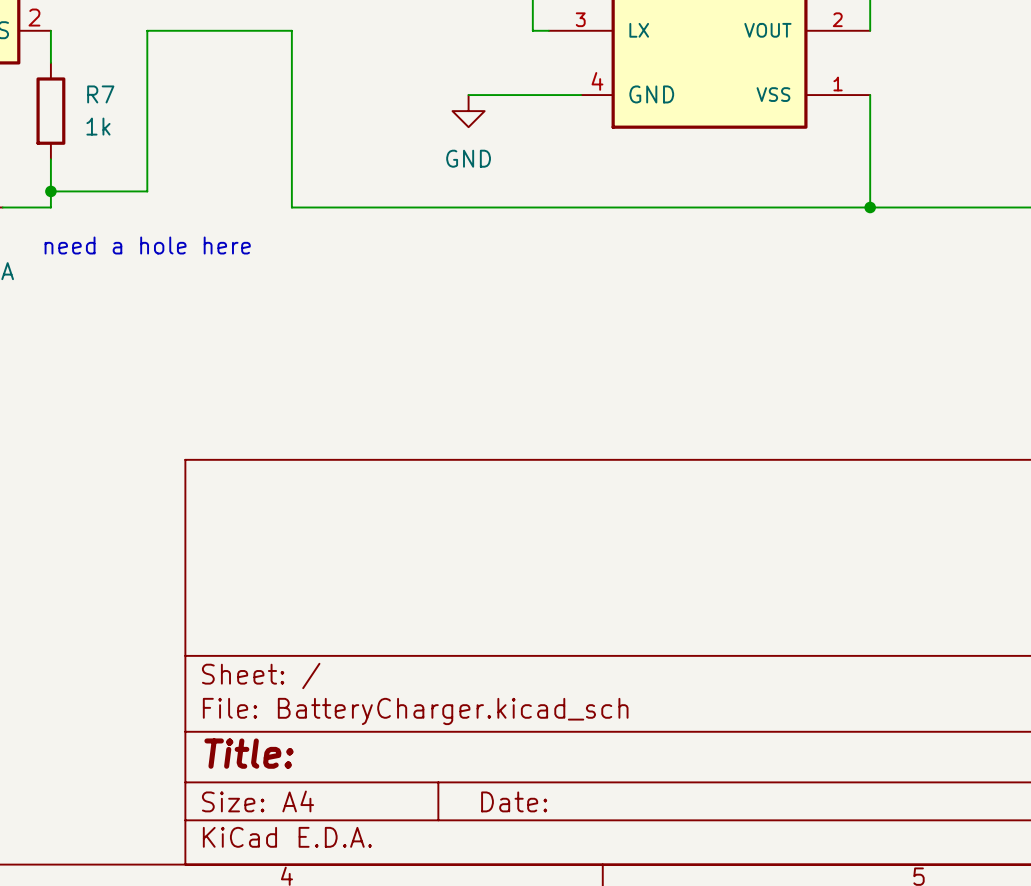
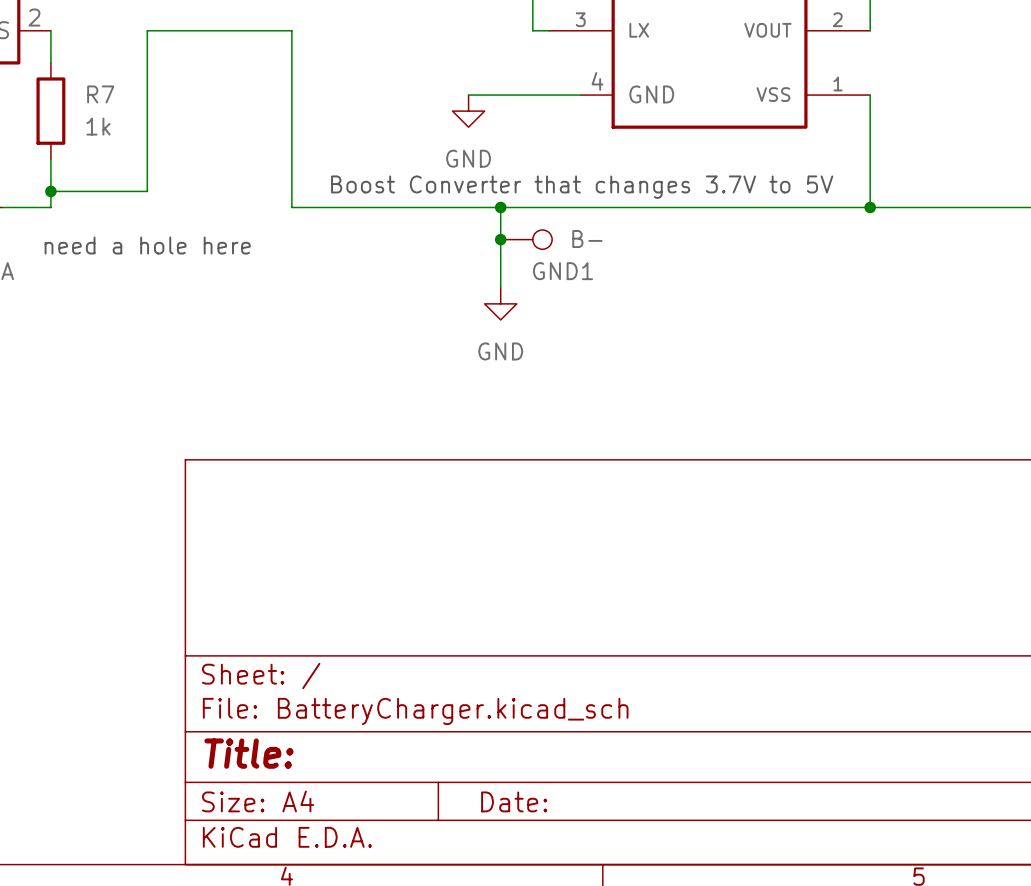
text: none -> Boost Converter that changes 3.7V to 5V (582, 187)
wire: none -> (500, 207) (500, 287)
junction: none -> (500, 207)
junction: none -> (500, 239)
GND1: none -> B- (526, 239)
power symbol: none -> GND (500, 303)

